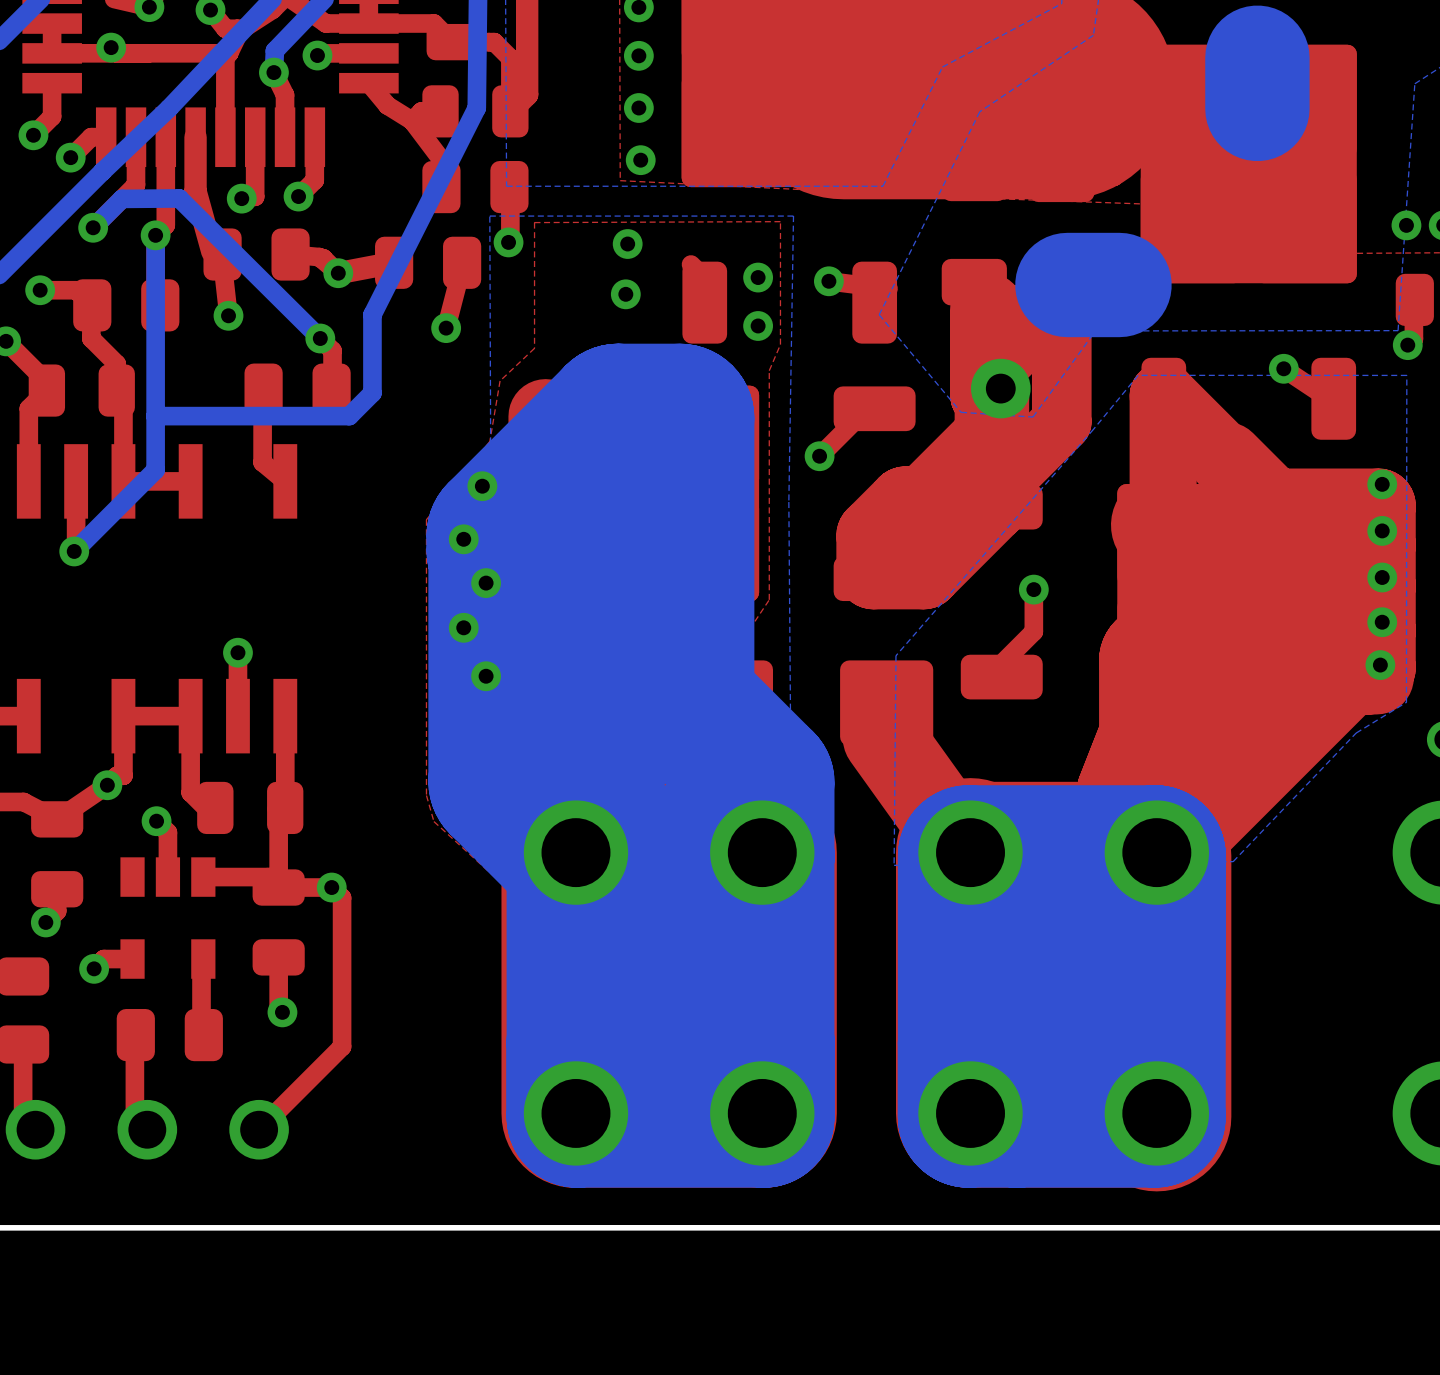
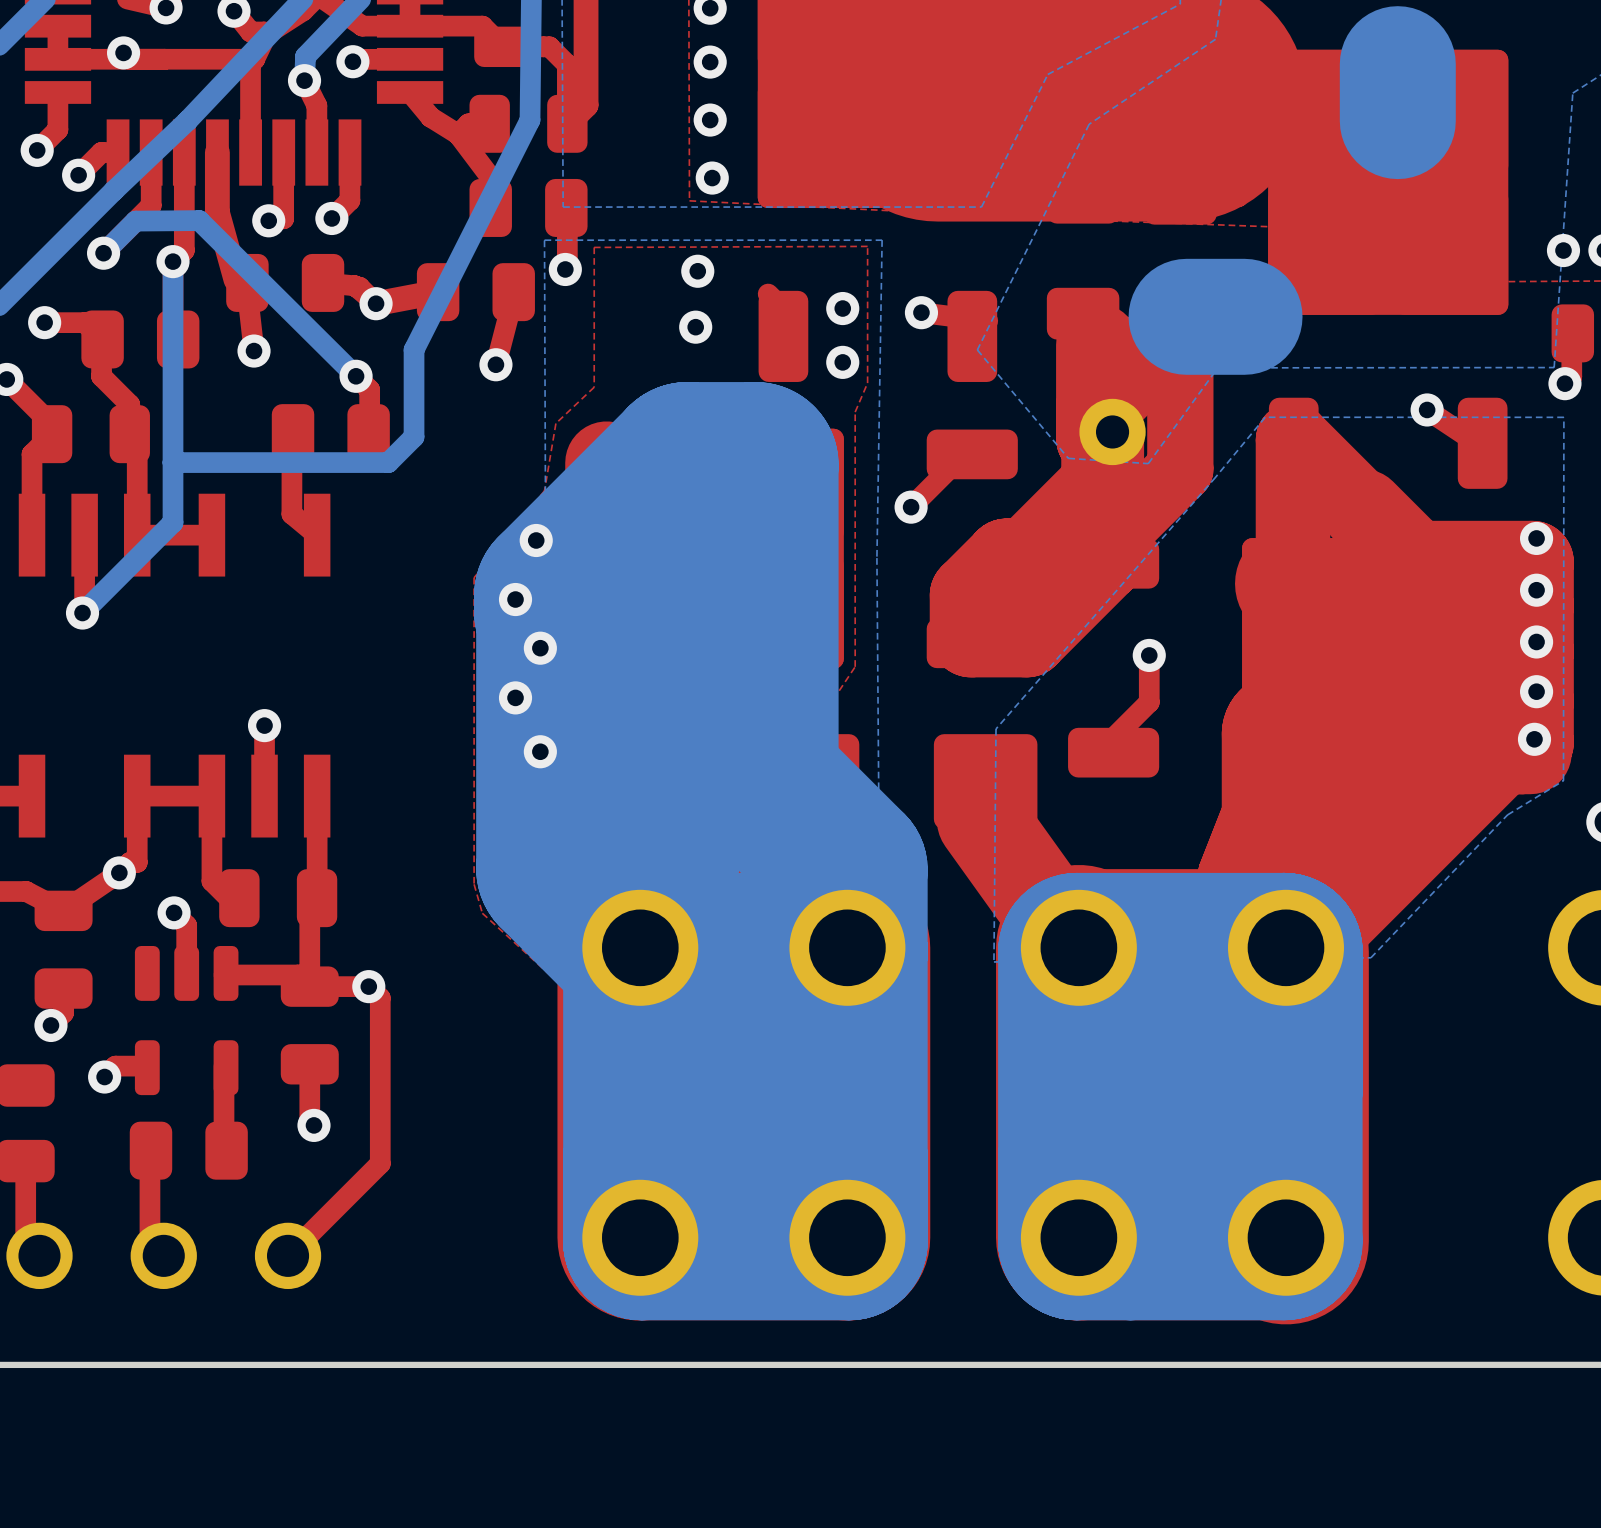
part footprint: [120, 857, 216, 979] -> [134, 945, 239, 1096]

